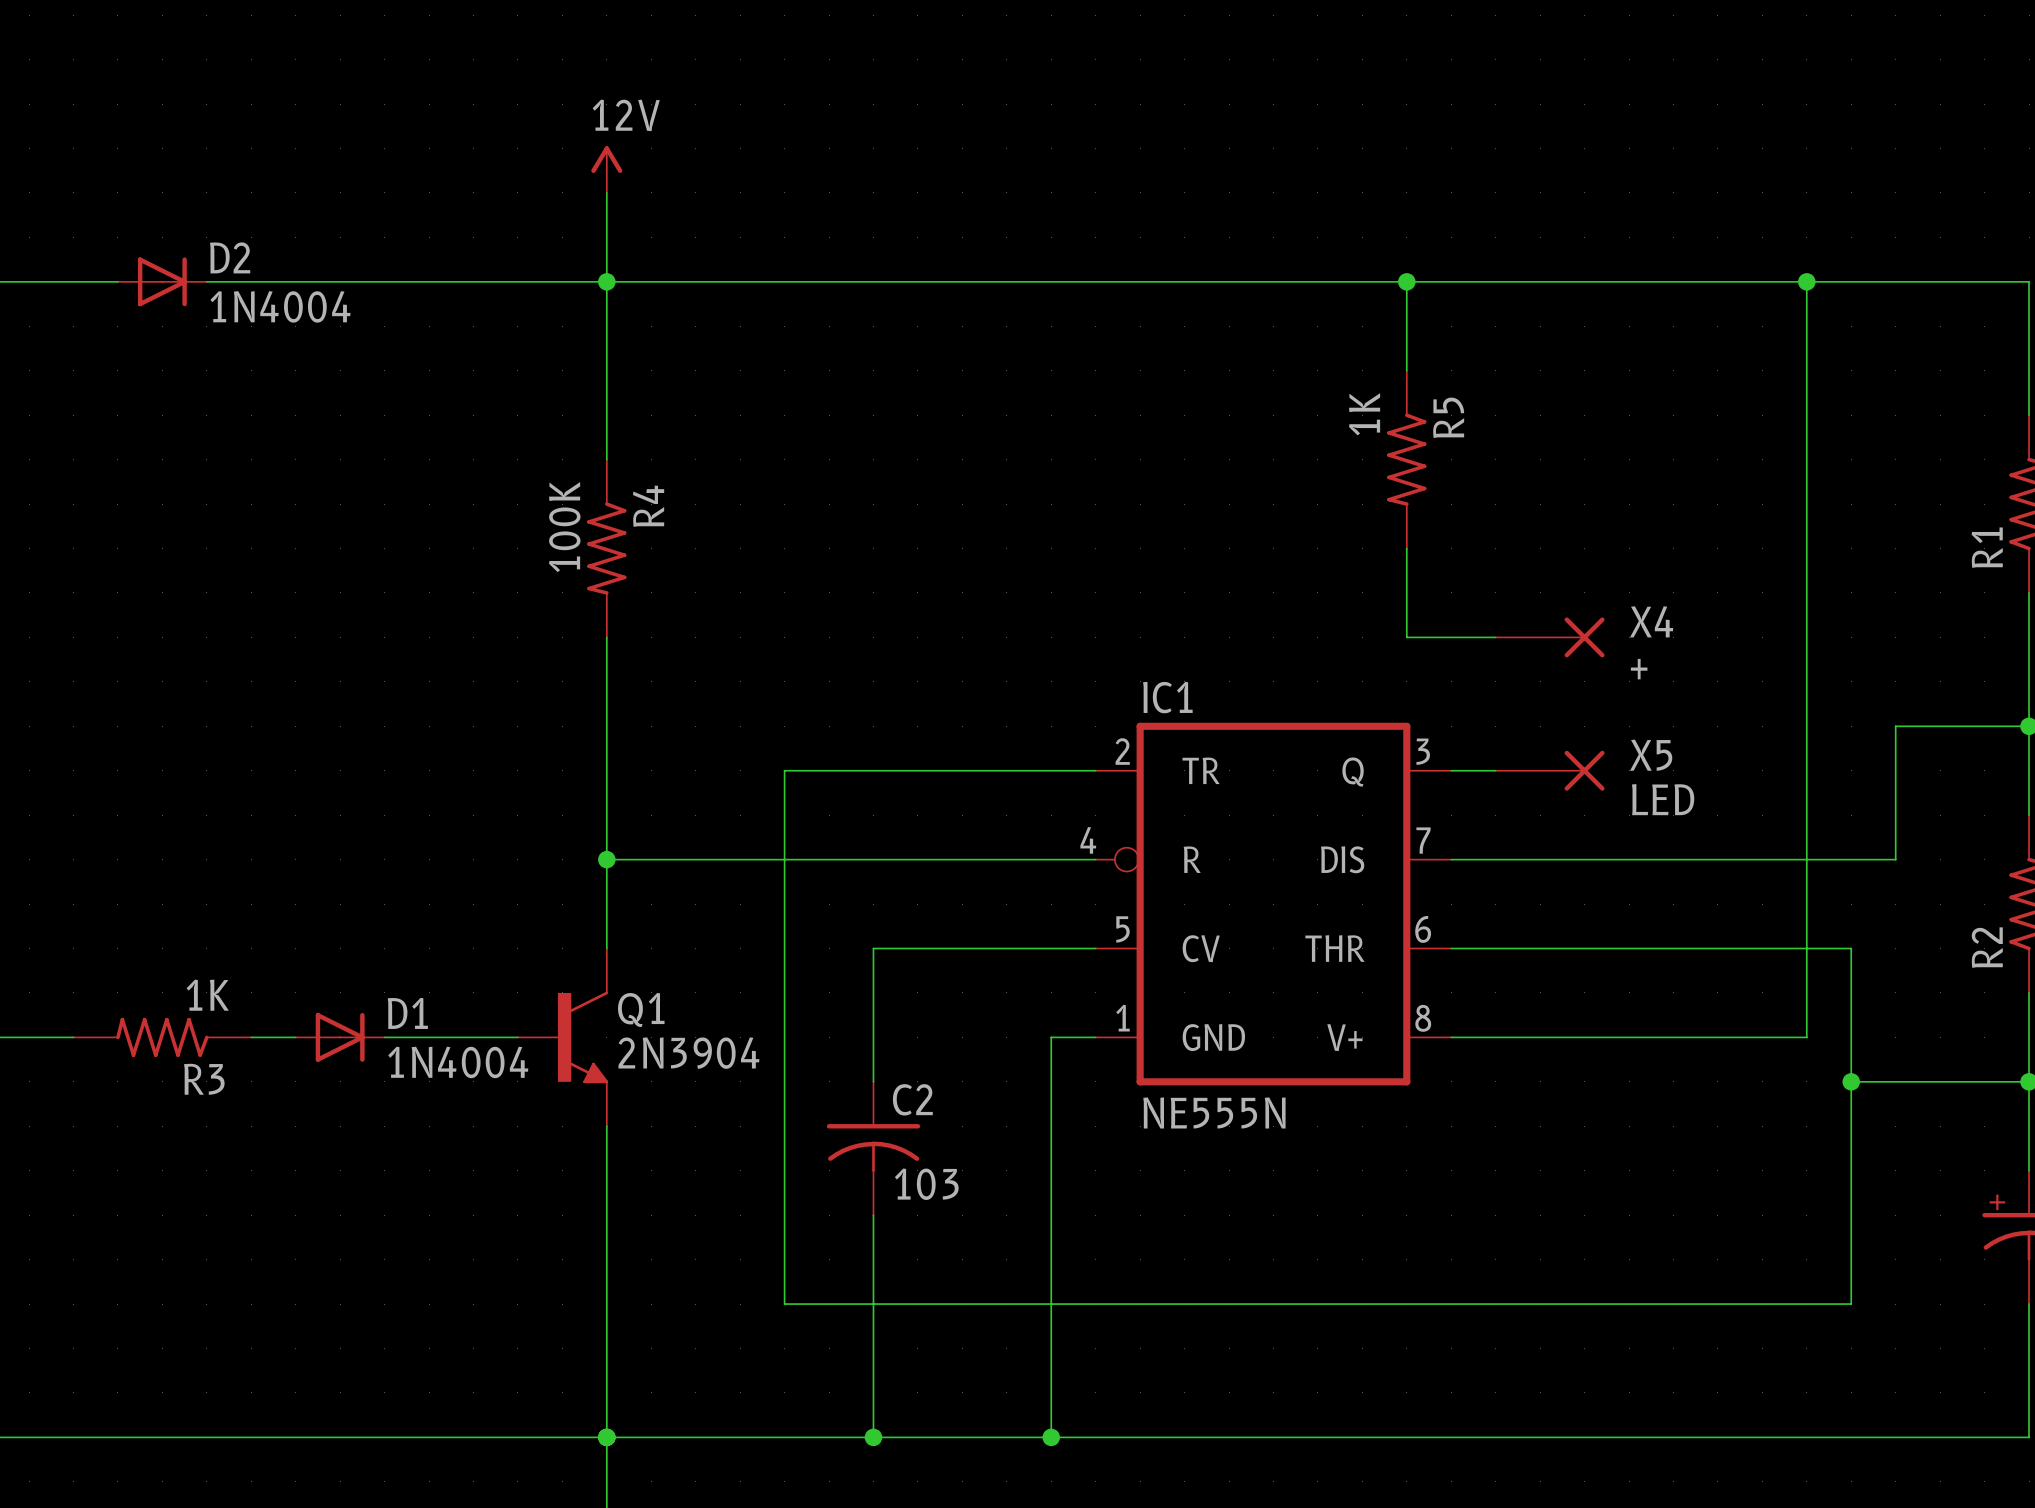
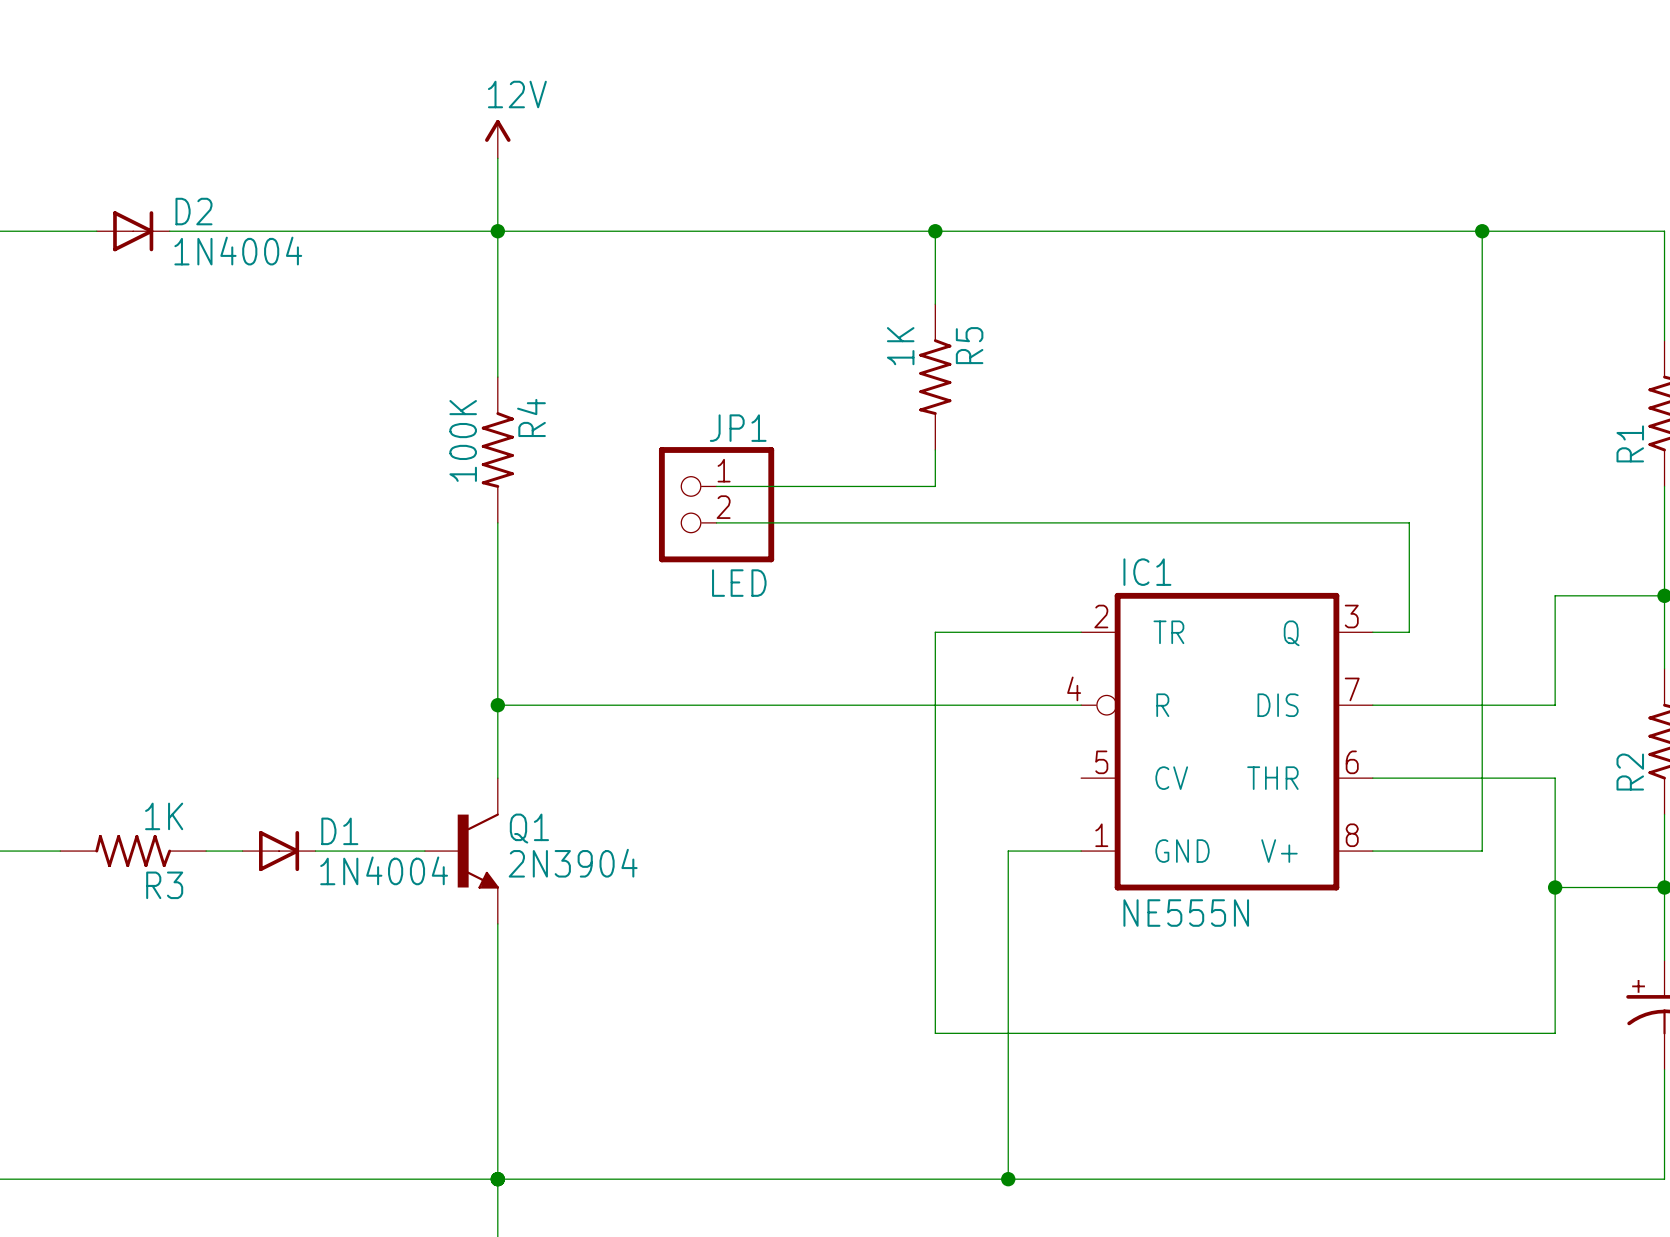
junction: none -> (935, 231)
wire: (1406, 281) (1406, 370) -> (935, 231) (935, 304)
junction: (1406, 281) -> none
R5 position: (1406, 459) -> (935, 377)
wire: none -> (935, 449) (935, 486) (716, 486)
wire: (1406, 548) (1406, 637) -> (716, 522) (1154, 522)
JP1: none -> LED (716, 504)
wire: none -> (1227, 522) (1409, 522) (1409, 632) (1372, 632)
X4: + (1550, 637) -> none
wire: (1095, 770) (784, 770) (784, 1304) (1851, 1304) (1851, 948) -> (1081, 632) (935, 632) (935, 1033) (1555, 1033) (1555, 778) (1518, 778)
wire: (1451, 770) (1495, 770) -> none
X5: LED (1550, 770) -> none
wire: (1451, 859) (1673, 859) -> (898, 705) (1081, 705)
IC1 position: (1273, 904) -> (1227, 741)
wire: (1095, 948) (873, 948) (873, 1081) -> none
wire: (1451, 948) (1673, 948) -> none
wire: (1095, 1037) (1051, 1037) (1051, 1437) -> none
wire: none -> (1081, 851) (1008, 851) (1008, 1179)
wire: (1451, 1037) (1673, 1037) -> none
wire: (1851, 1081) (1895, 1081) -> none
junction position: (1851, 1081) -> (1555, 887)
C2: 103 (873, 1148) -> none
wire: (873, 1215) (873, 1437) -> none
junction: (873, 1437) -> none
junction: (1051, 1437) -> none
junction: none -> (1008, 1179)

